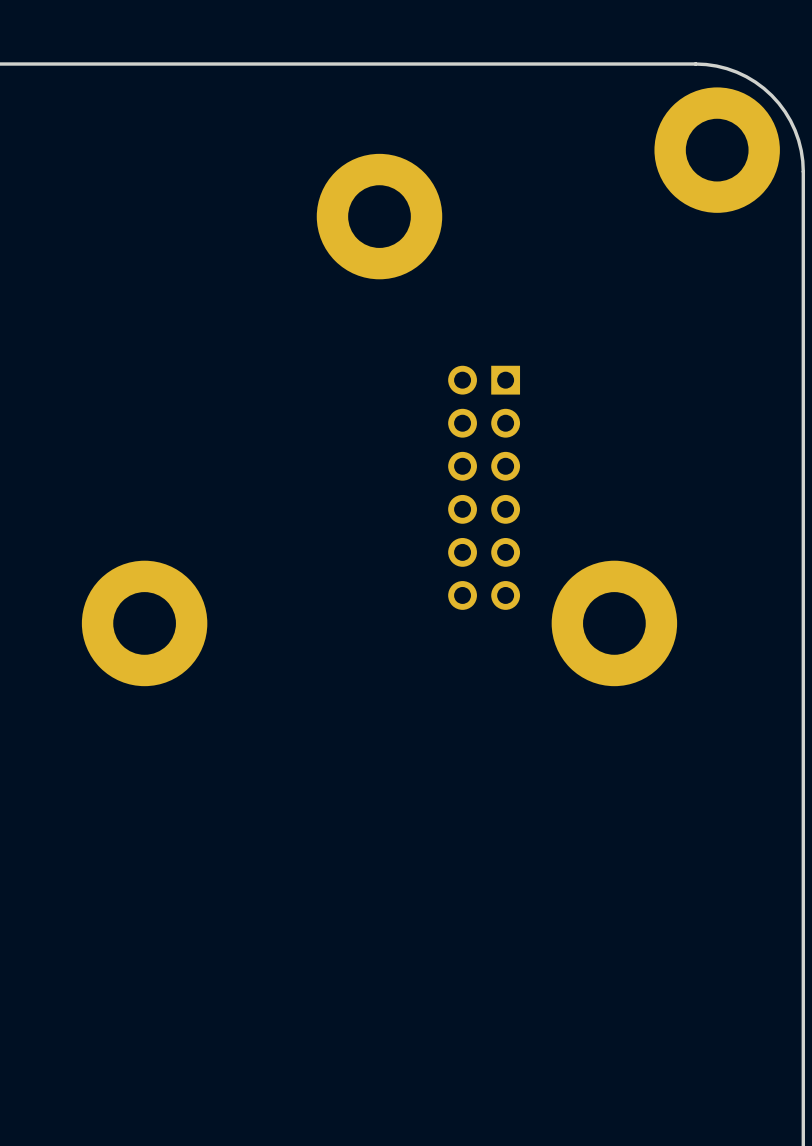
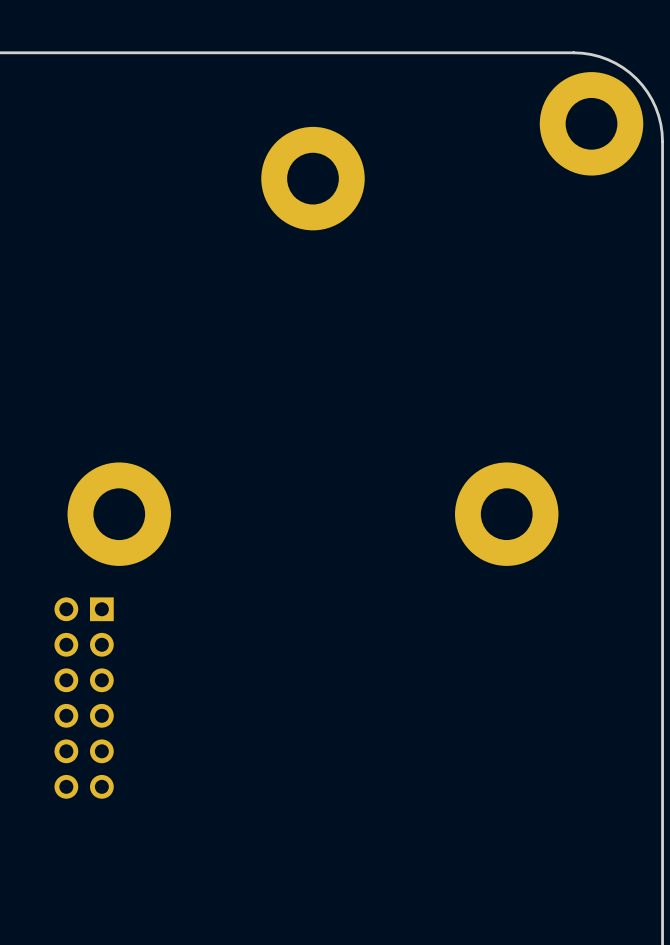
part: (484, 487) -> none
part: none -> (84, 698)

